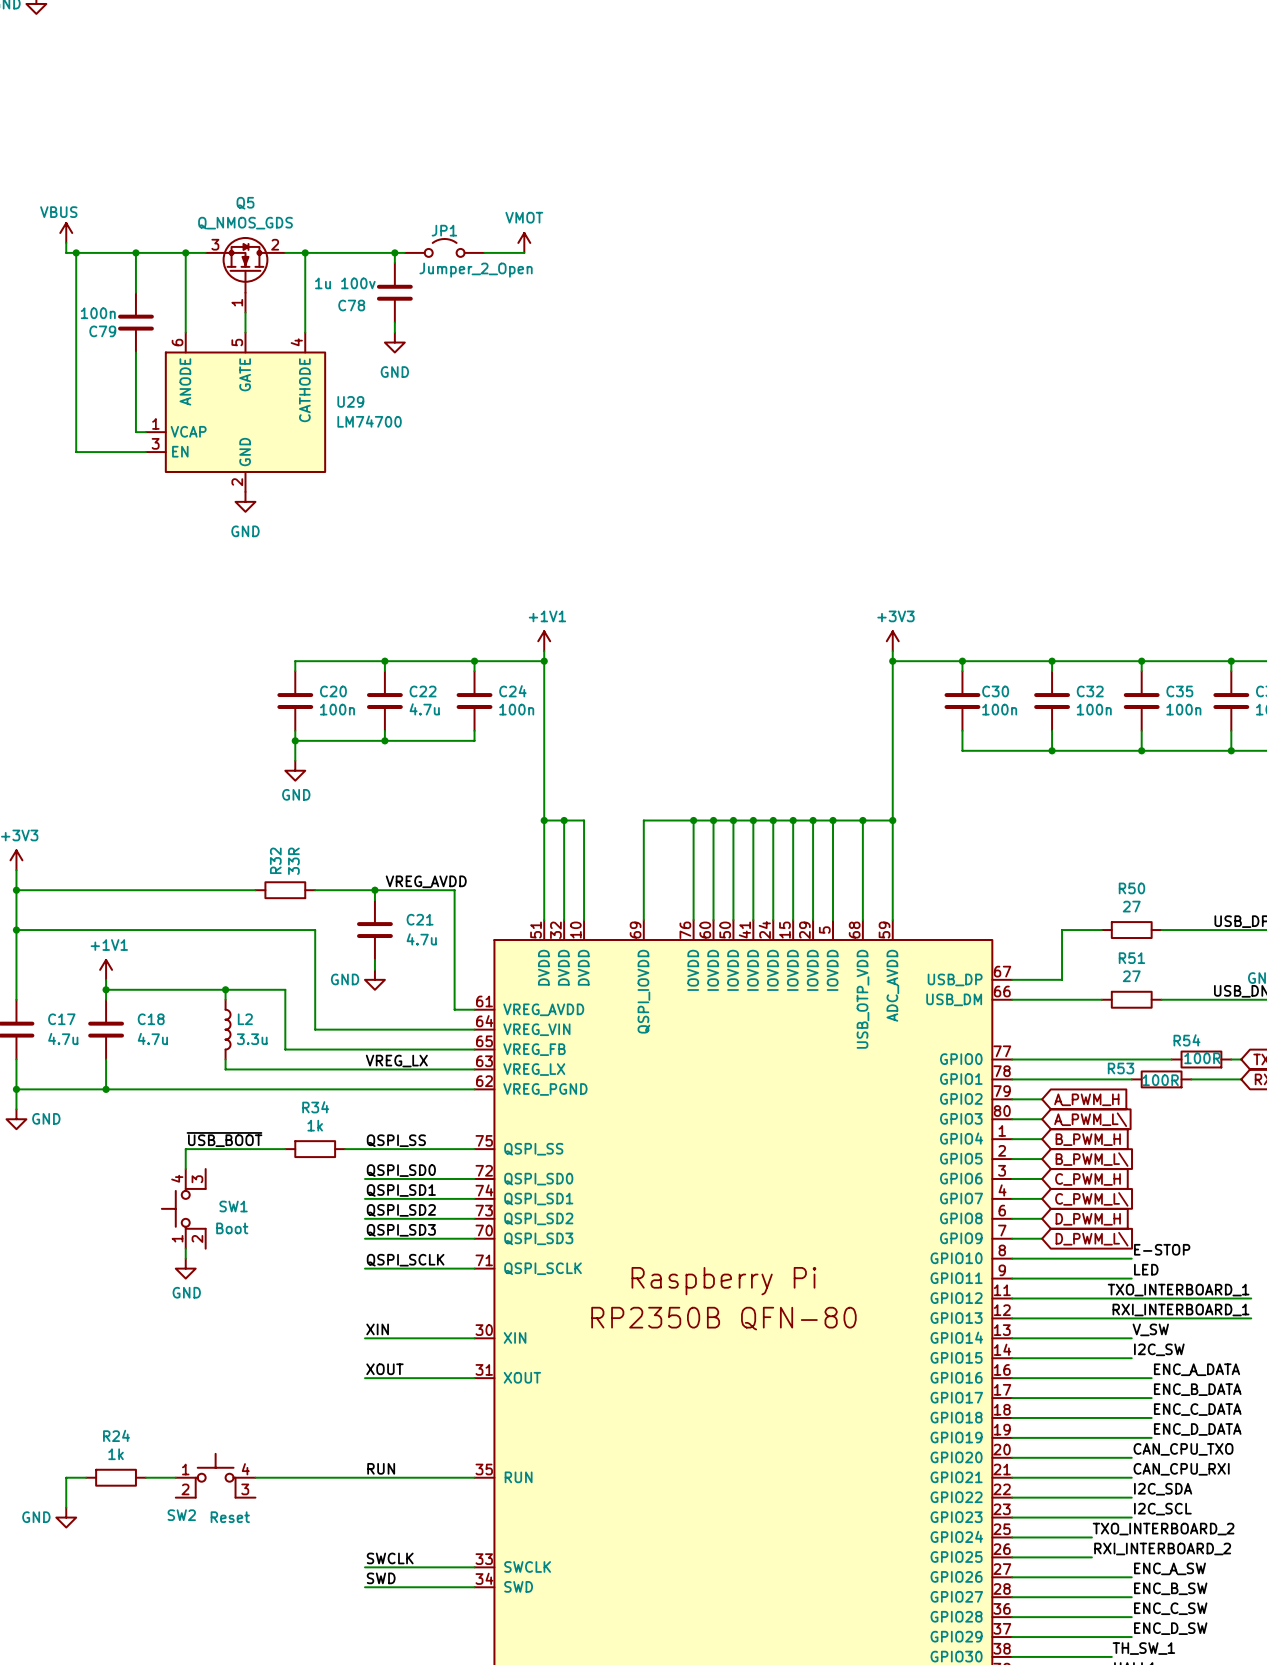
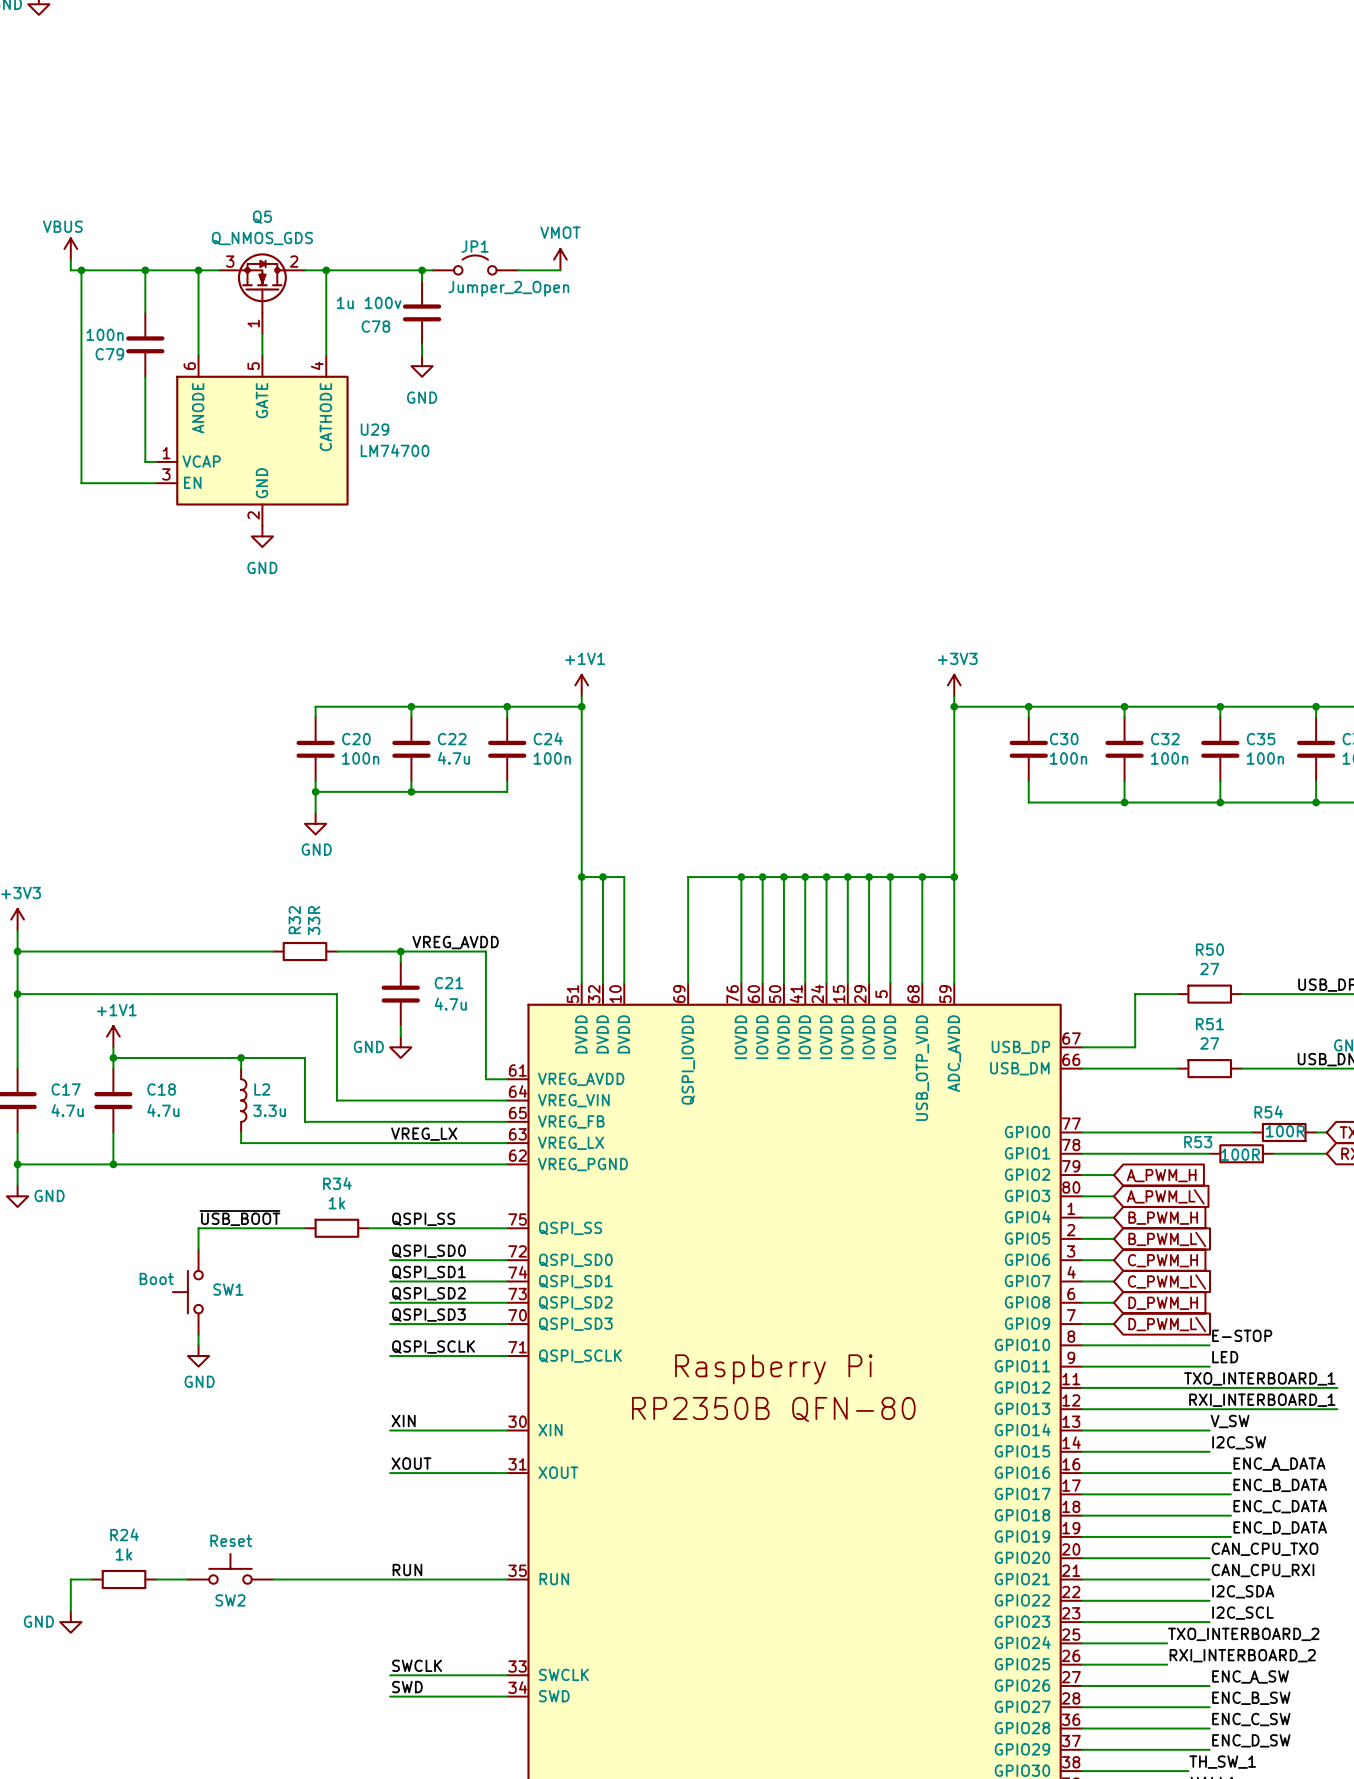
SW1 symbol: [161, 1169, 206, 1249] -> [173, 1249, 203, 1335]
SW1 text position: Boot (232, 1228) -> Boot (156, 1278)
SW2 symbol: [175, 1453, 256, 1498] -> [187, 1553, 274, 1584]
SW2 name position: SW2 (181, 1515) -> SW2 (230, 1600)
SW2 text position: Reset (230, 1517) -> Reset (231, 1540)

